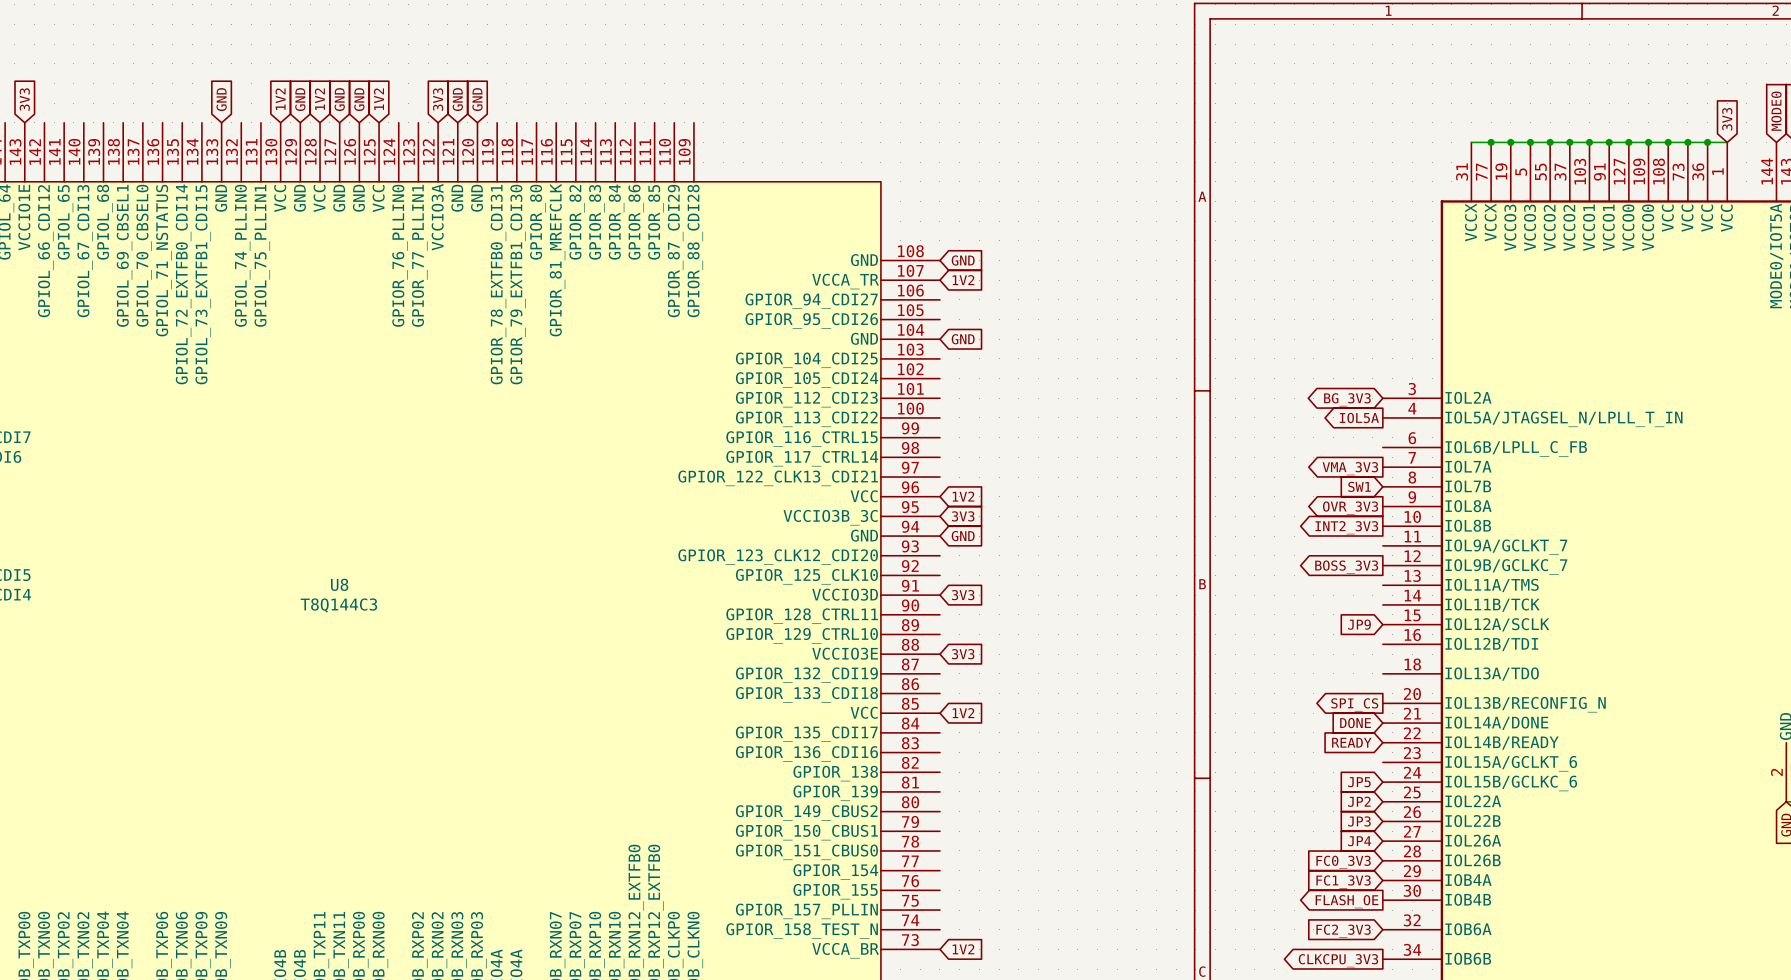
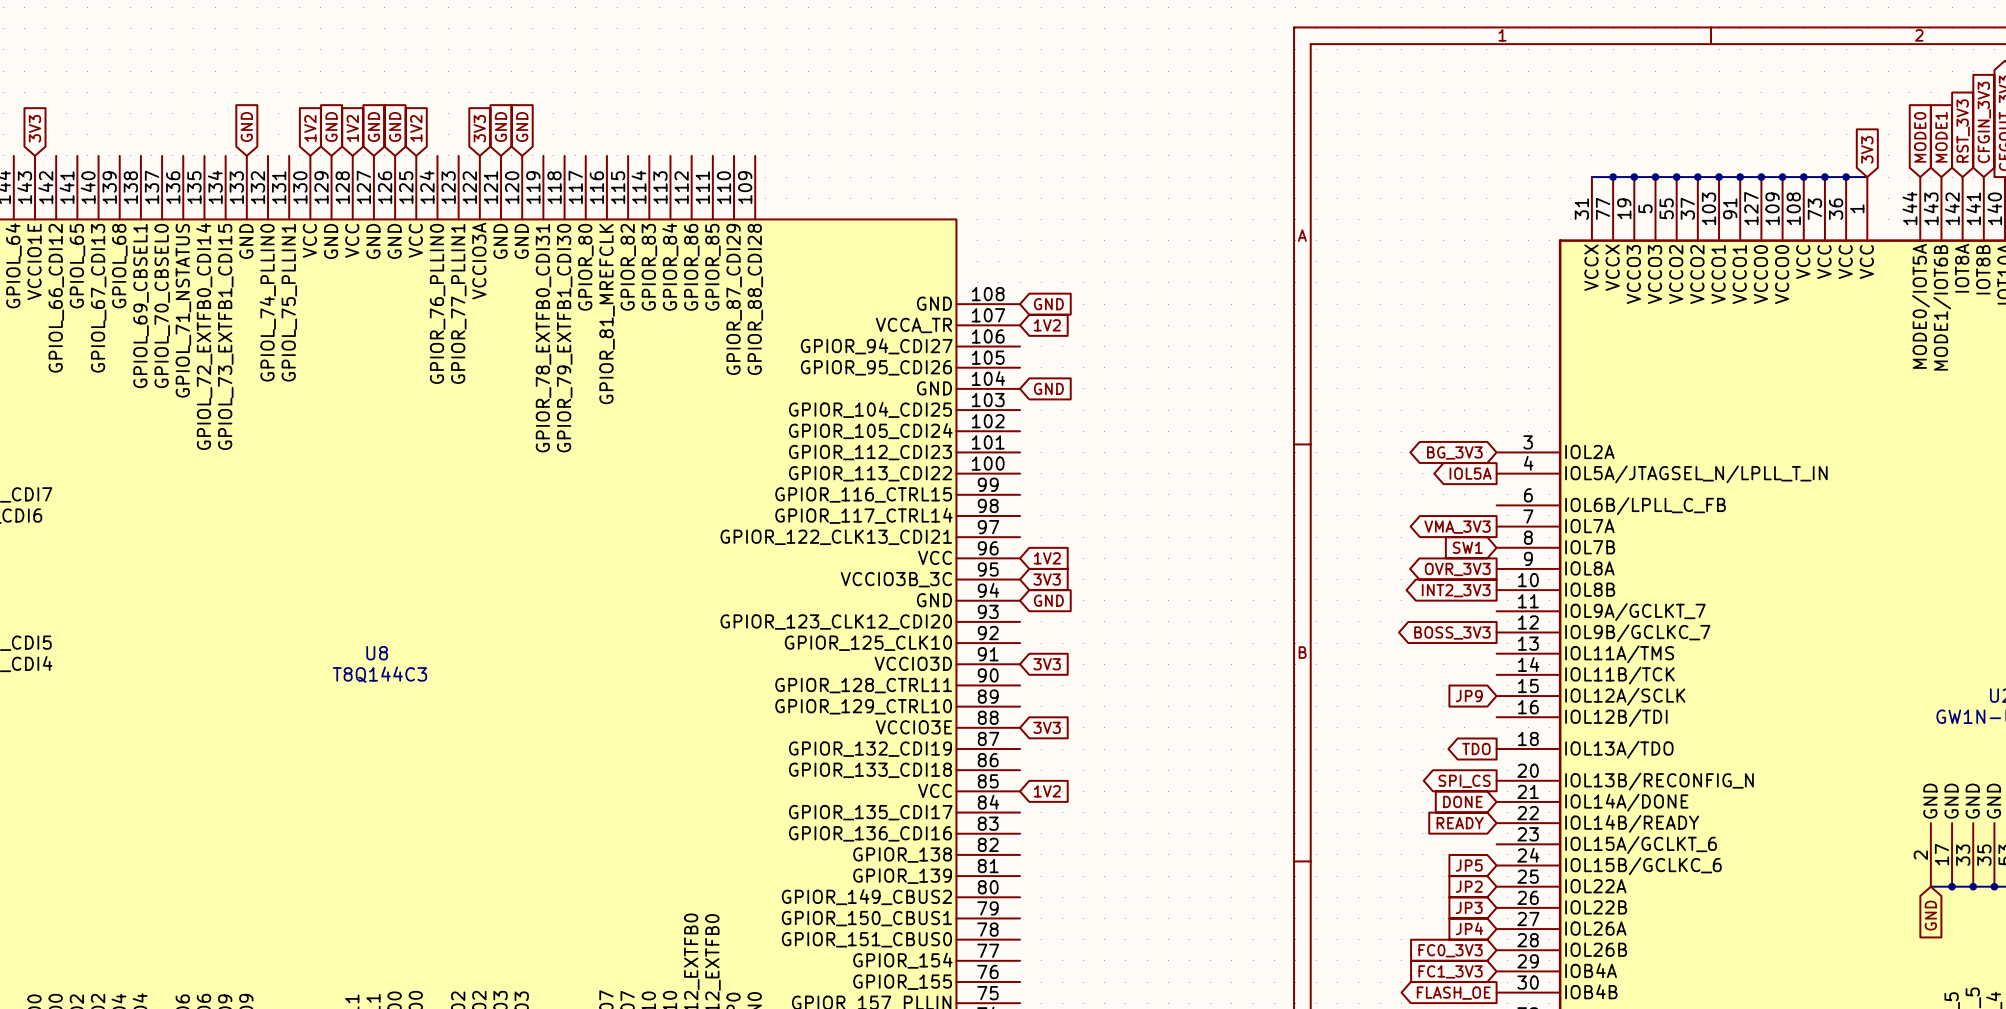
global label: none -> TDO (1476, 749)

